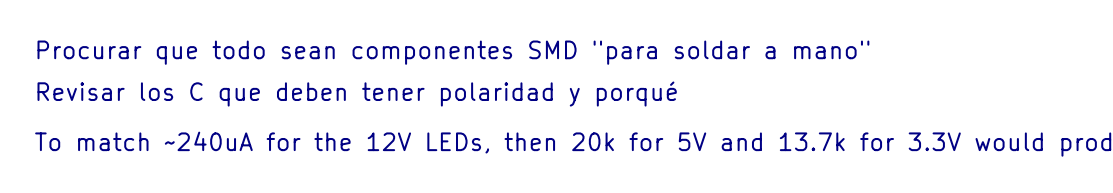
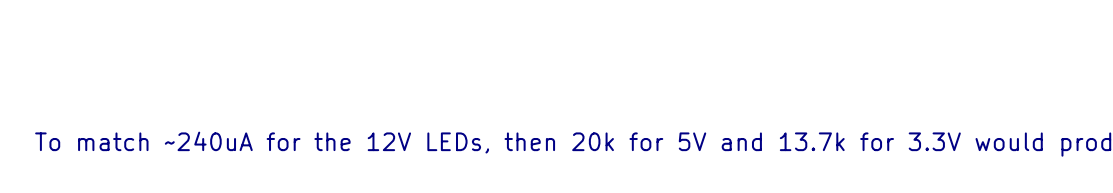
text: Procurar que todo sean componentes SMD "para soldar a mano" (453, 52) -> none
text: Revisar los C que deben tener polaridad y porqué (357, 94) -> none

